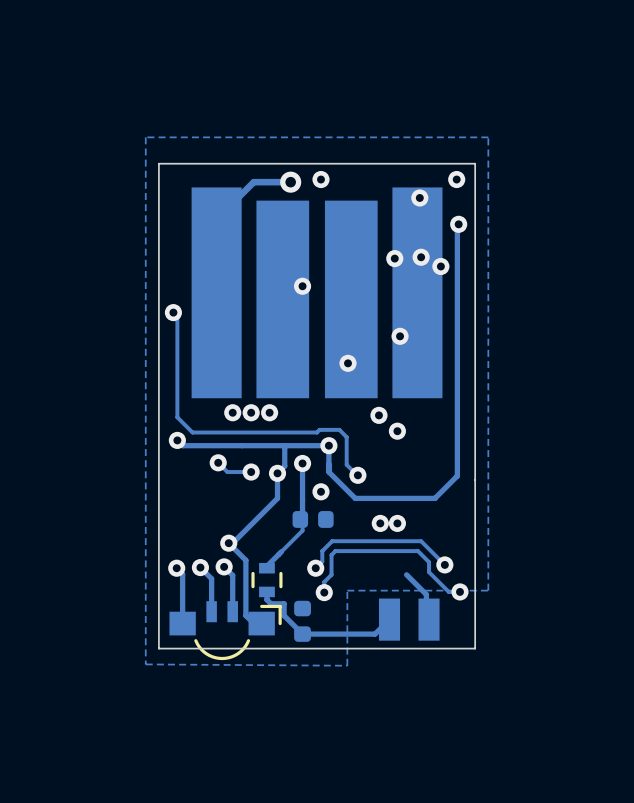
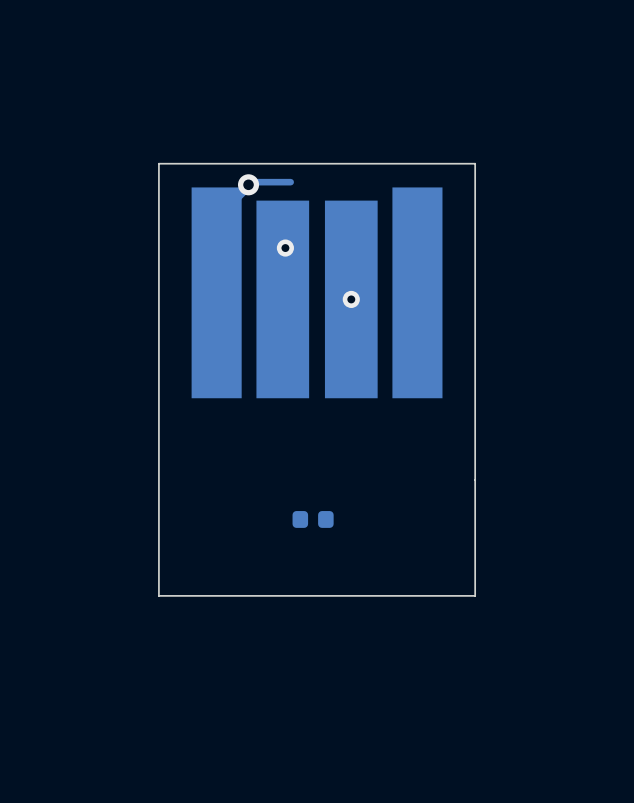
zone outline: (488, 137) (488, 590) (347, 590) (347, 665) (145, 664) (145, 137) (488, 137) -> none
via: (320, 179) -> none
via: (456, 179) -> none
via position: (290, 182) -> (248, 184)
via: (419, 197) -> none
track: (458, 224) (457, 475) (434, 498) (355, 498) (328, 472) (328, 445) (182, 445) (177, 440) -> none
via: (458, 224) -> none
via: none -> (285, 248)
via: (421, 257) -> none
via: (394, 258) -> none
via: (440, 266) -> none
via: (302, 286) -> none
via: none -> (351, 299)
track: (173, 312) (177, 316) (177, 417) (192, 432) (317, 432) (319, 429) (339, 429) (346, 437) (346, 464) (357, 475) -> none
via: (173, 312) -> none
via: (400, 336) -> none
via: (348, 363) -> none
via: (232, 412) -> none
via: (251, 412) -> none
via: (269, 412) -> none
via: (378, 415) -> none
via: (397, 431) -> none
via: (177, 440) -> none
track: (284, 445) (284, 466) (277, 473) (277, 498) (232, 543) (228, 543) (245, 560) (245, 615) (253, 623) (261, 623) -> none
via: (328, 445) -> none
track: (218, 462) (227, 472) (251, 472) -> none
via: (218, 462) -> none
track: (302, 463) (302, 517) (300, 519) -> none
via: (302, 463) -> none
via: (251, 472) -> none
via: (277, 473) -> none
via: (357, 475) -> none
via: (320, 491) -> none
track: (302, 499) (302, 530) (280, 553) -> none
via: (380, 523) -> none
via: (397, 523) -> none
via: (228, 543) -> none
track: (281, 551) (266, 568) -> none
track: (444, 564) (421, 541) (332, 541) (322, 551) (322, 561) (315, 568) -> none
via: (444, 564) -> none
track: (224, 566) (232, 575) (232, 611) -> none
via: (224, 566) -> none
track: (200, 567) (211, 578) (211, 611) -> none
via: (200, 567) -> none
track: (176, 568) (182, 574) (182, 623) -> none
via: (176, 568) -> none
via: (315, 568) -> none
track: (406, 574) (426, 594) (426, 615) (422, 619) (429, 619) -> none
part: (266, 580) -> none
track: (266, 591) (266, 599) (270, 603) (284, 603) (284, 615) (302, 634) (375, 634) (389, 619) -> none
track: (460, 591) (448, 591) (429, 572) (429, 562) (417, 551) (335, 551) (331, 555) (331, 574) (324, 582) (324, 592) -> none
via: (460, 591) -> none
via: (324, 592) -> none
board edge: (475, 595) (475, 648) (158, 648) (158, 595) -> (475, 595) (158, 595)
part: (409, 619) -> none
part: (302, 621) -> none
part: (225, 630) -> none

